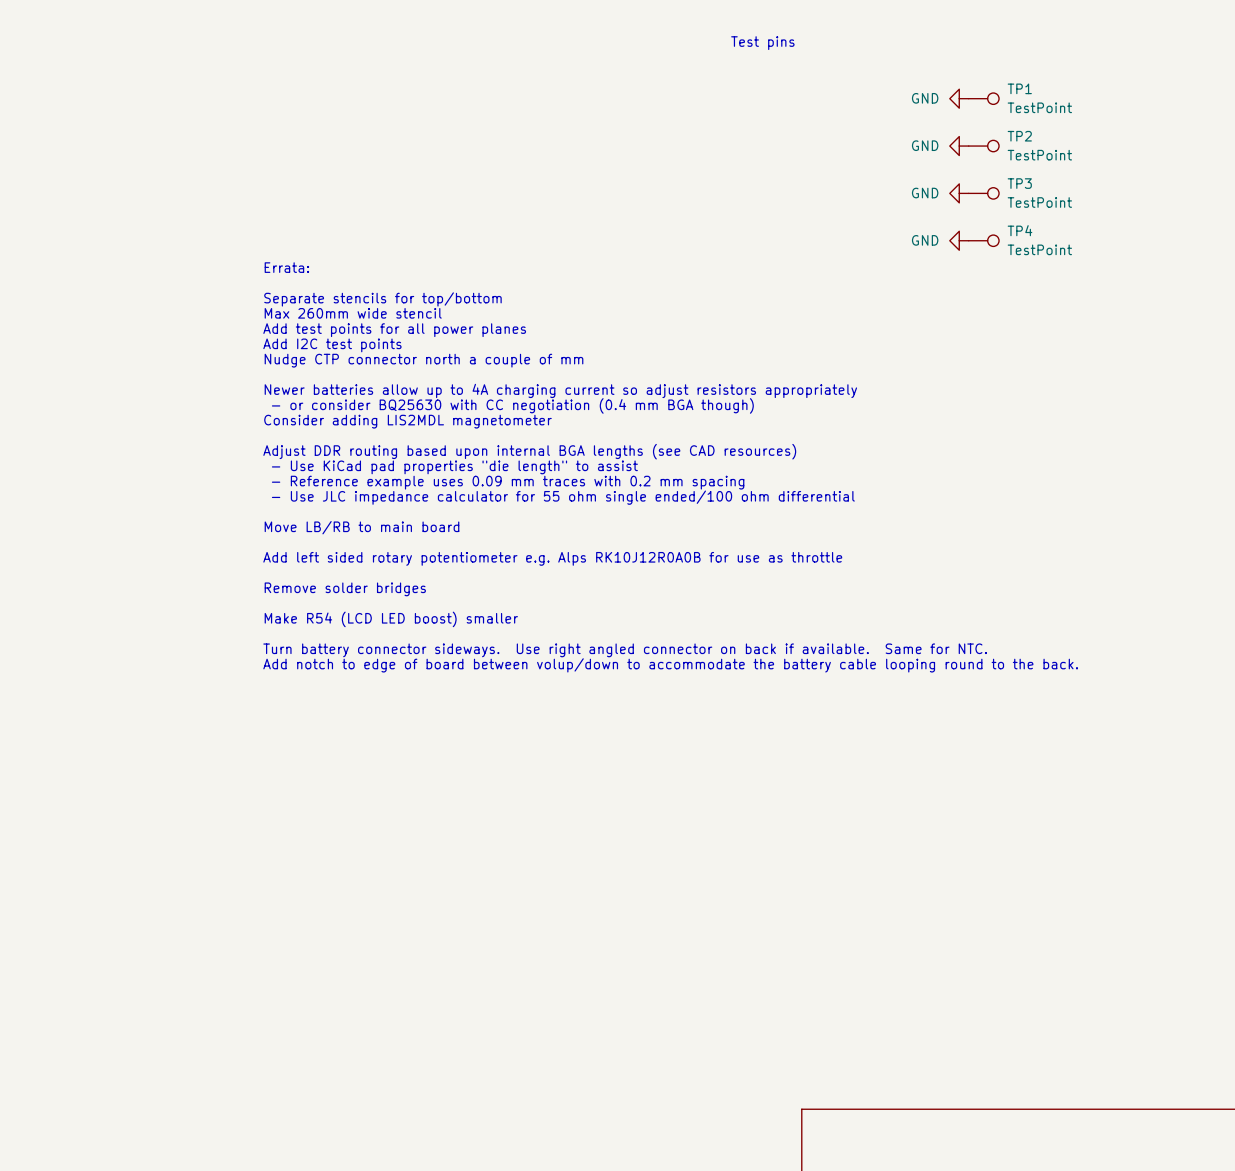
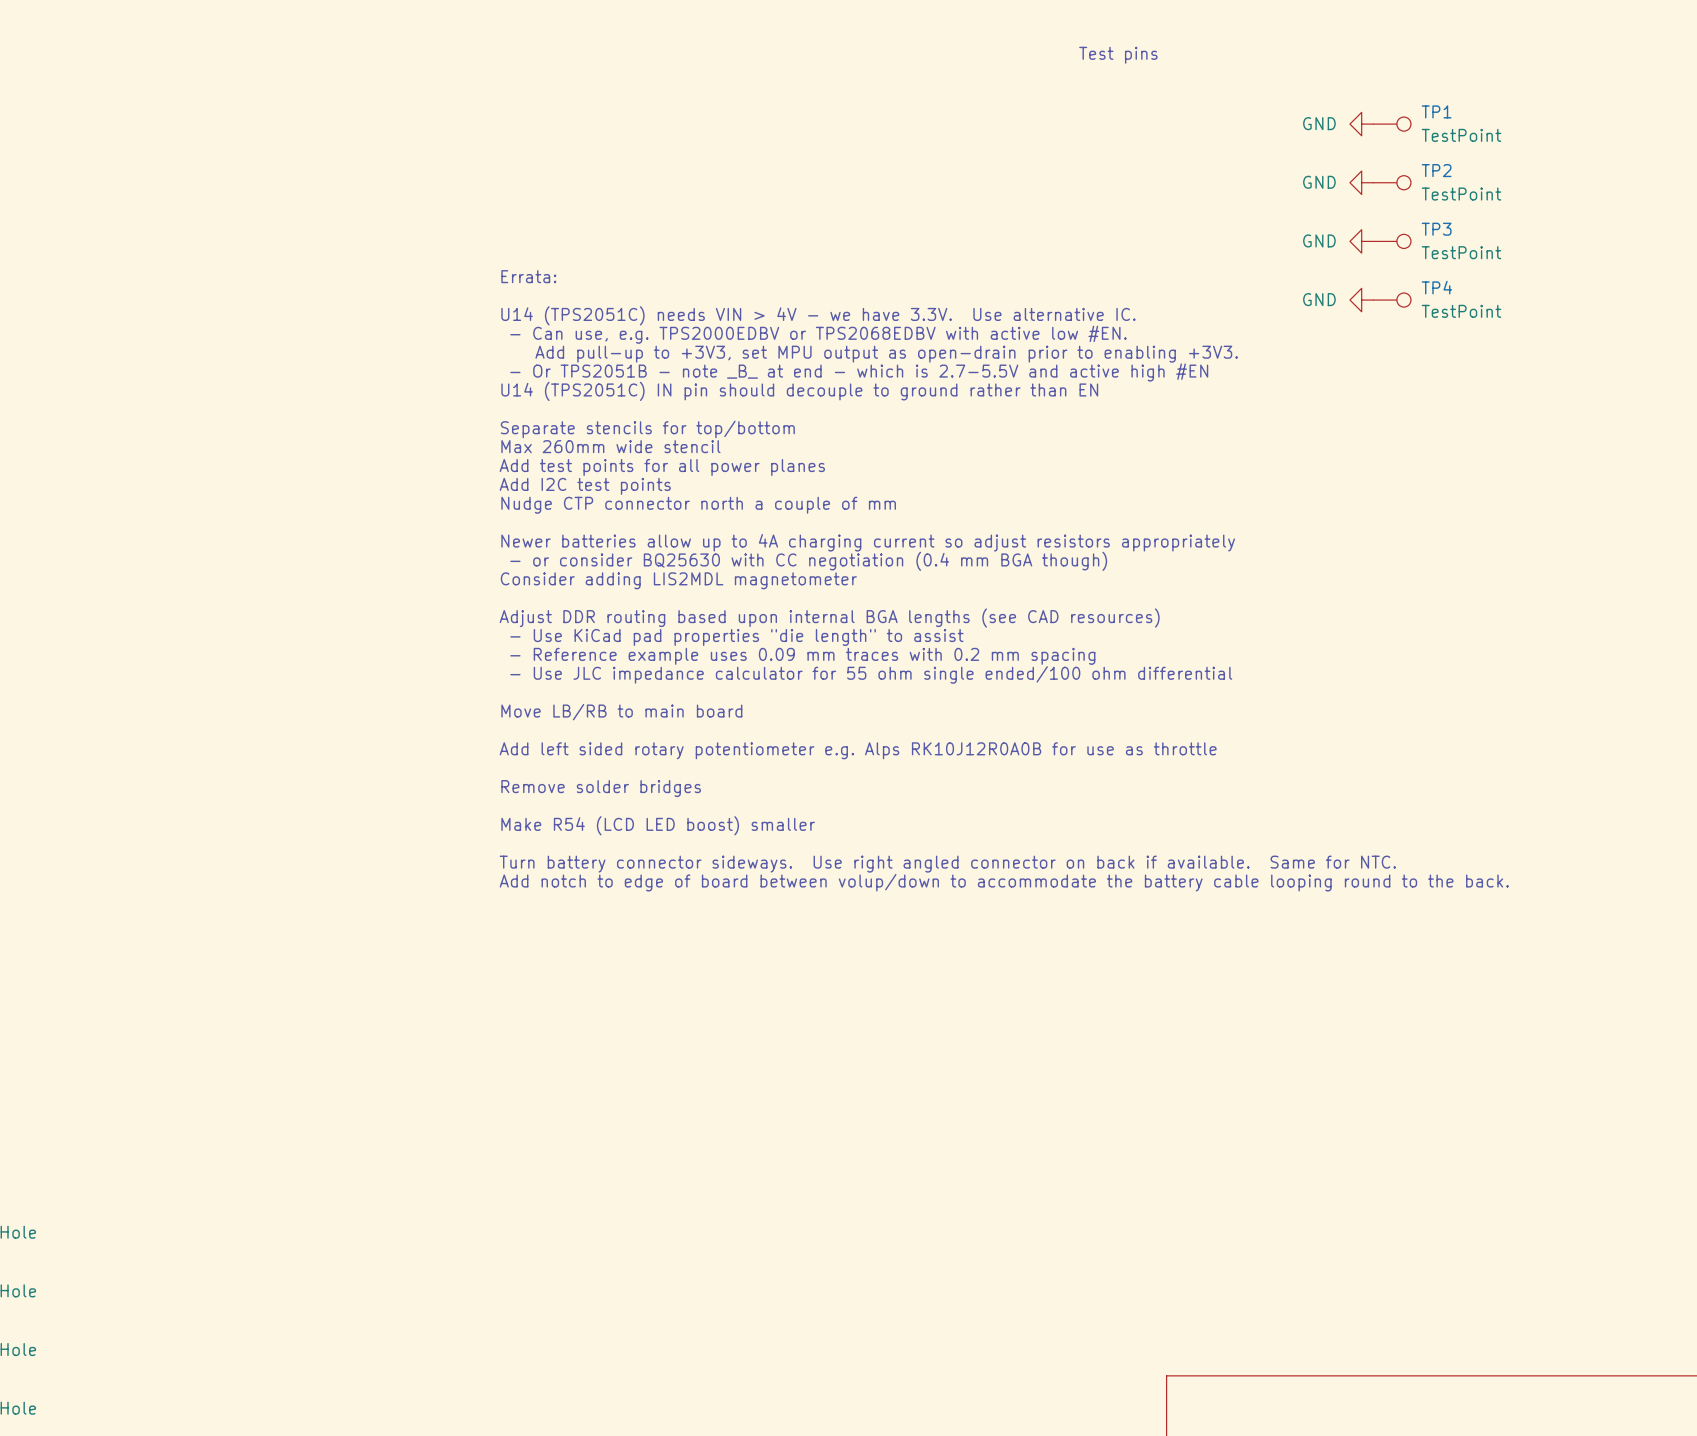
text: none -> Errata: (528, 276)
text: none -> U14 (TPS2051C) needs VIN > 4V - we have 3.3V. Use alternative IC. (818, 315)
text: Errata: (286, 267) -> - Can use, e.g. TPS2000EDBV or TPS2068EDBV with active low #EN. (818, 334)
text: none -> Add pull-up to +3V3, set MPU output as open-drain prior to enabling +3V3. (886, 354)
text: Separate stencils for top/bottom (382, 299) -> - Or TPS2051B - note _B_ at end - which is 2.7-5.5V and active high #EN (859, 372)
text: Max 260mm wide stencil (353, 313) -> U14 (TPS2051C) IN pin should decouple to ground rather than EN (799, 391)
text position: Add test points for all power planes (394, 330) -> Add test points for all power planes (662, 467)
text: Add I2C test points (332, 345) -> Separate stencils for top/bottom (647, 429)
text: Nudge CTP connector north a couple of mm (424, 360) -> Max 260mm wide stencil (610, 446)
text: Newer batteries allow up to 4A charging current so adjust resistors appropriately (560, 390) -> Add I2C test points (585, 486)
text: - or consider BQ25630 with CC negotiation (0.4 mm BGA though) (512, 405) -> Nudge CTP connector north a couple of mm (698, 505)
text: Consider adding LIS2MDL magnetometer (407, 421) -> none
text: none -> Newer batteries allow up to 4A charging current so adjust resistors appropriately (868, 542)
text: Adjust DDR routing based upon internal BGA lengths (see CAD resources) (529, 451) -> - or consider BQ25630 with CC negotiation (0.4 mm BGA though) (808, 561)
text: - Use KiCad pad properties "die length" to assist (454, 467) -> Consider adding LIS2MDL magnetometer (678, 580)
text: - Reference example uses 0.09 mm traces with 0.2 mm spacing (508, 482) -> none
text: - Use JLC impedance calculator for 55 ohm single ended/100 ohm differential (563, 497) -> Adjust DDR routing based upon internal BGA lengths (see CAD resources) (829, 618)
text: none -> - Use KiCad pad properties "die length" to assist (736, 637)
text: Move LB/RB to main board (361, 527) -> - Reference example uses 0.09 mm traces with 0.2 mm spacing (802, 656)
text: none -> - Use JLC impedance calculator for 55 ohm single ended/100 ohm differential (871, 674)
text position: Add left sided rotary potentiometer e.g. Alps RK10J12R0A0B for use as throttle (552, 558) -> Add left sided rotary potentiometer e.g. Alps RK10J12R0A0B for use as throttle (858, 750)
text: none -> Move LB/RB to main board (621, 712)
text position: Remove solder bridges (345, 589) -> Remove solder bridges (601, 788)
text: Make R54 (LCD LED boost) smaller (391, 619) -> none
text position: Turn battery connector sideways. Use right angled connector on back if available. Same for NTC. (625, 650) -> Turn battery connector sideways. Use right angled connector on back if available. Same for NTC. (947, 864)
text: Add notch to edge of board between volup/down to accommodate the battery cable looping round to the back. (670, 665) -> Make R54 (LCD LED boost) smaller (658, 825)
text: none -> Add notch to edge of board between volup/down to accommodate the battery cable looping round to the back. (1004, 882)

